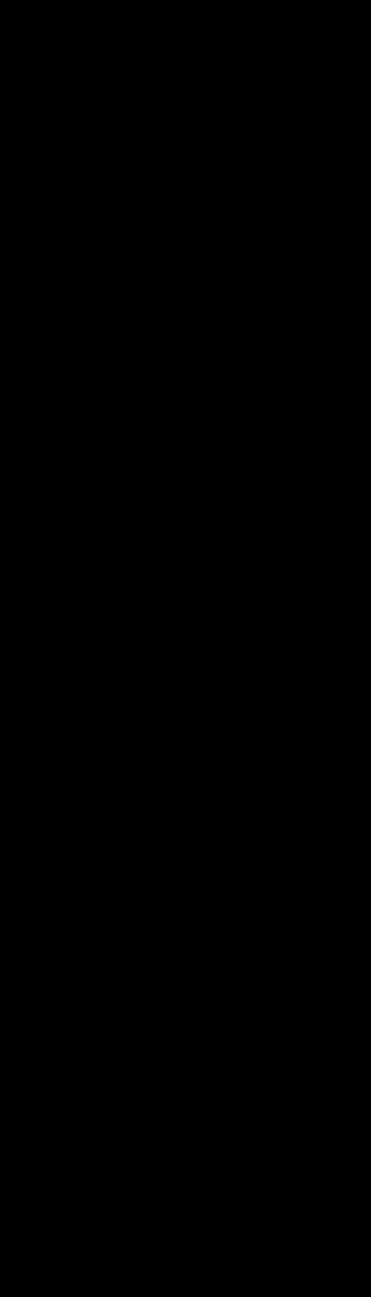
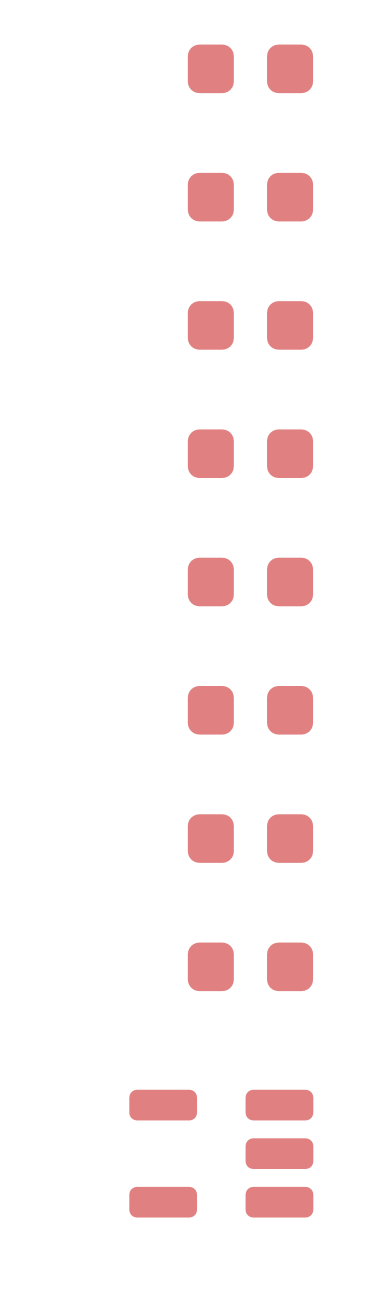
part: none -> (250, 68)
part: none -> (250, 197)
part: none -> (250, 325)
part: none -> (250, 453)
part: none -> (250, 581)
part: none -> (250, 710)
part: none -> (250, 838)
part: none -> (250, 966)
part: none -> (221, 1153)

